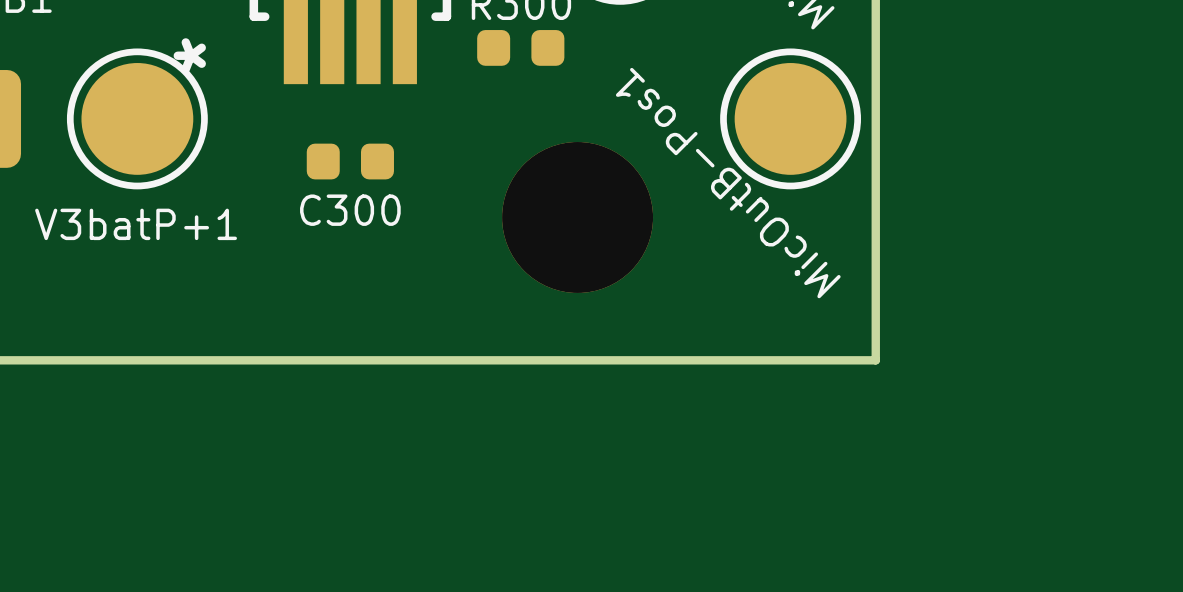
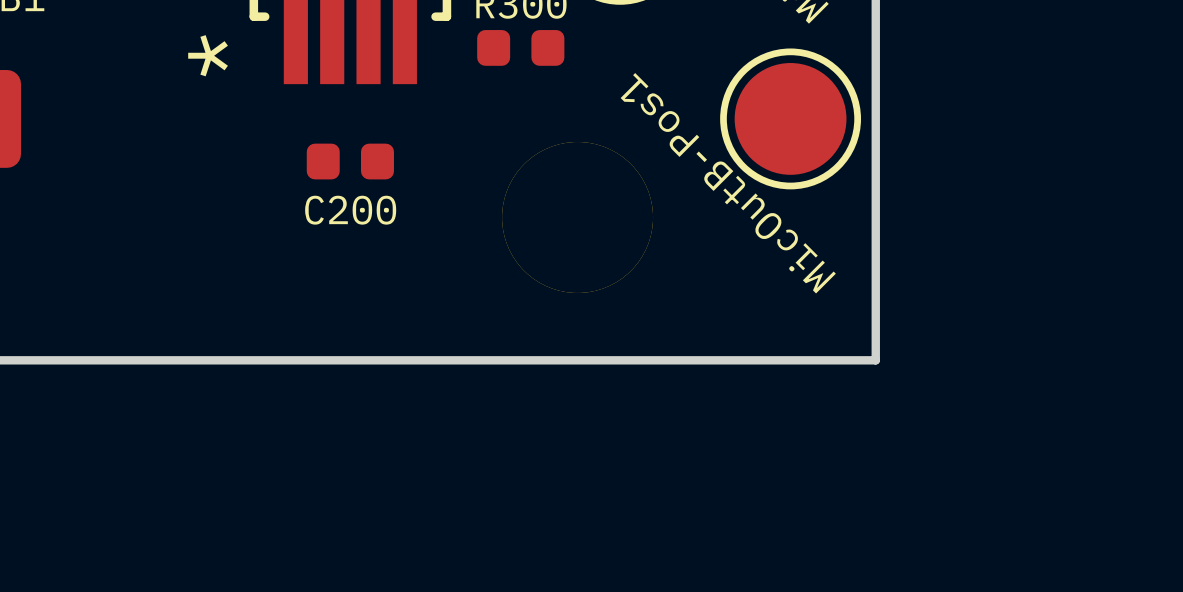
V3batP+1: (137, 118) -> none
C300 name: C300 (350, 210) -> C200 (350, 210)

